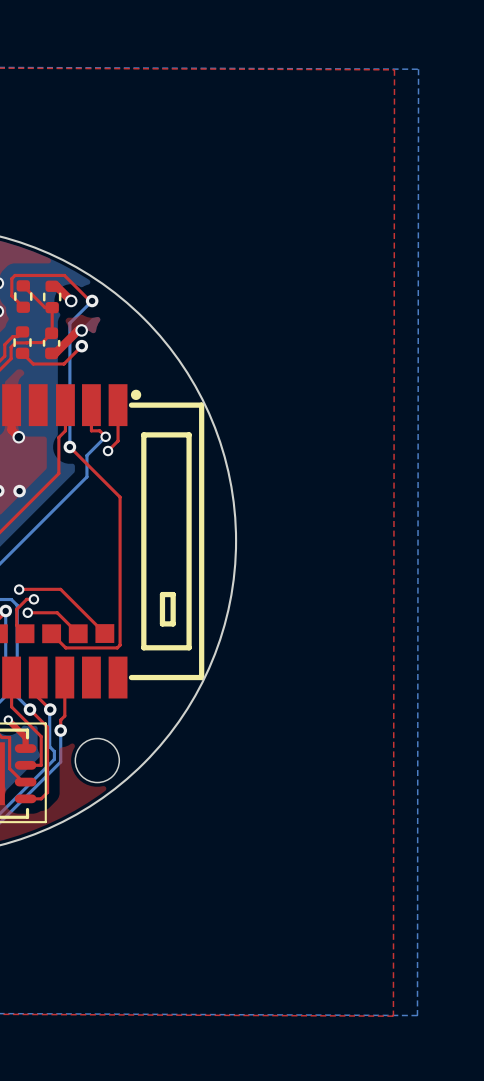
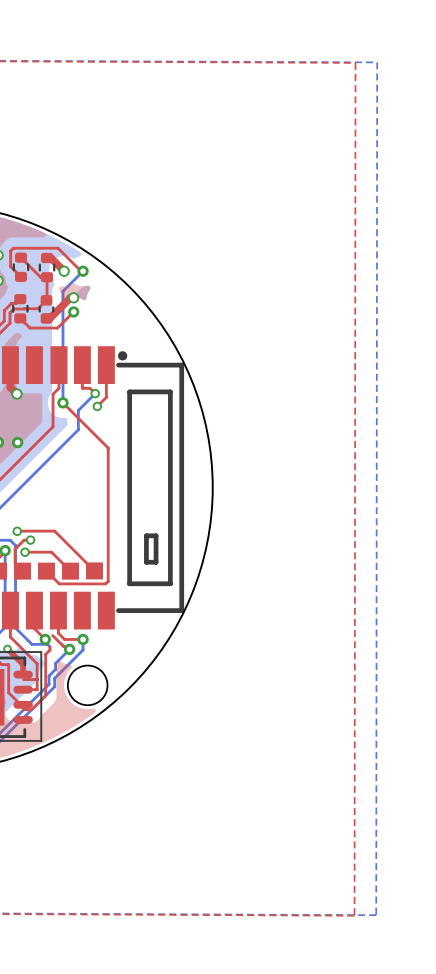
top track: (64, 702) (64, 715) (60, 720) (60, 730) -> (58, 633) (64, 639) (83, 639)
top track: none -> (52, 635) (63, 646) (69, 649)
top track: (30, 709) (47, 727) (47, 792) (41, 798) (25, 798) -> none
bottom track: none -> (27, 639) (31, 644) (47, 644) (50, 646)
via: (30, 709) -> none
bottom track: (50, 709) (49, 746) (54, 751) -> (69, 649) (55, 663) (55, 669) (49, 677)
via: none -> (83, 639)
top track: none -> (50, 646) (50, 650) (45, 654) (45, 695) (31, 709) (23, 709)
via: none -> (69, 649)
bottom track: (60, 730) (60, 752) -> (83, 639) (83, 649) (54, 678)
via: (60, 730) -> none
top track: none -> (23, 679) (37, 679)

